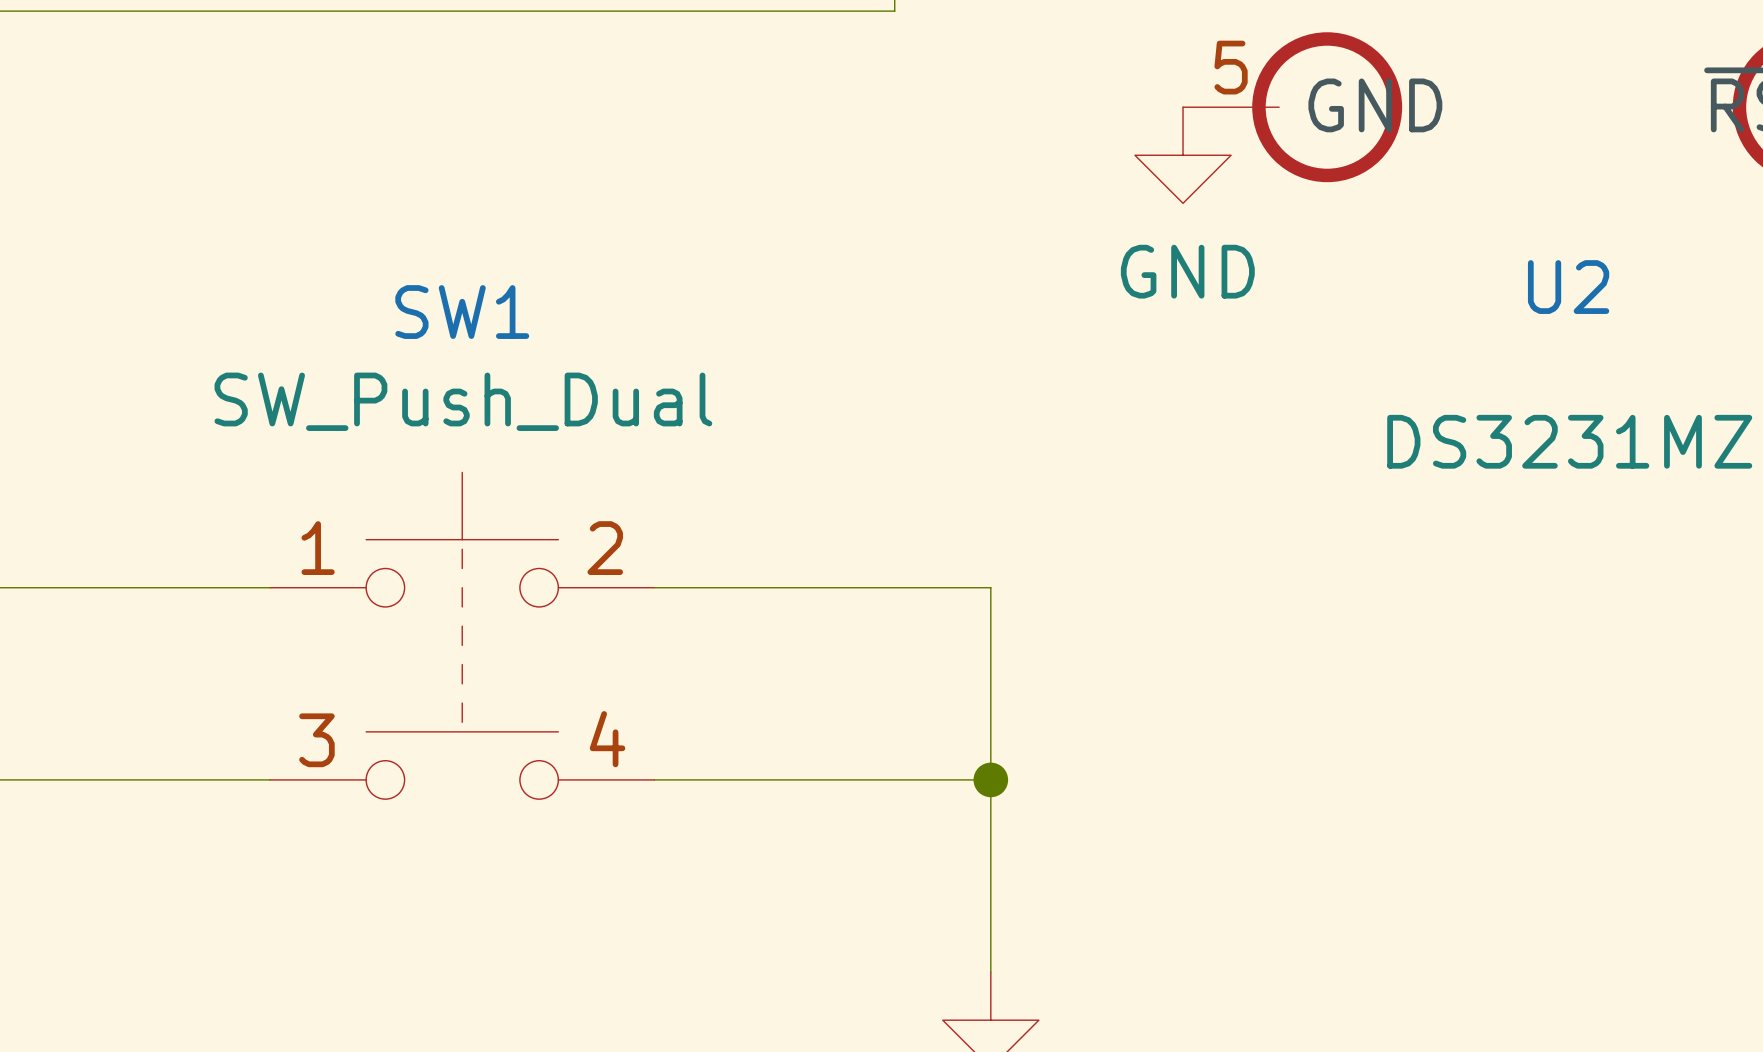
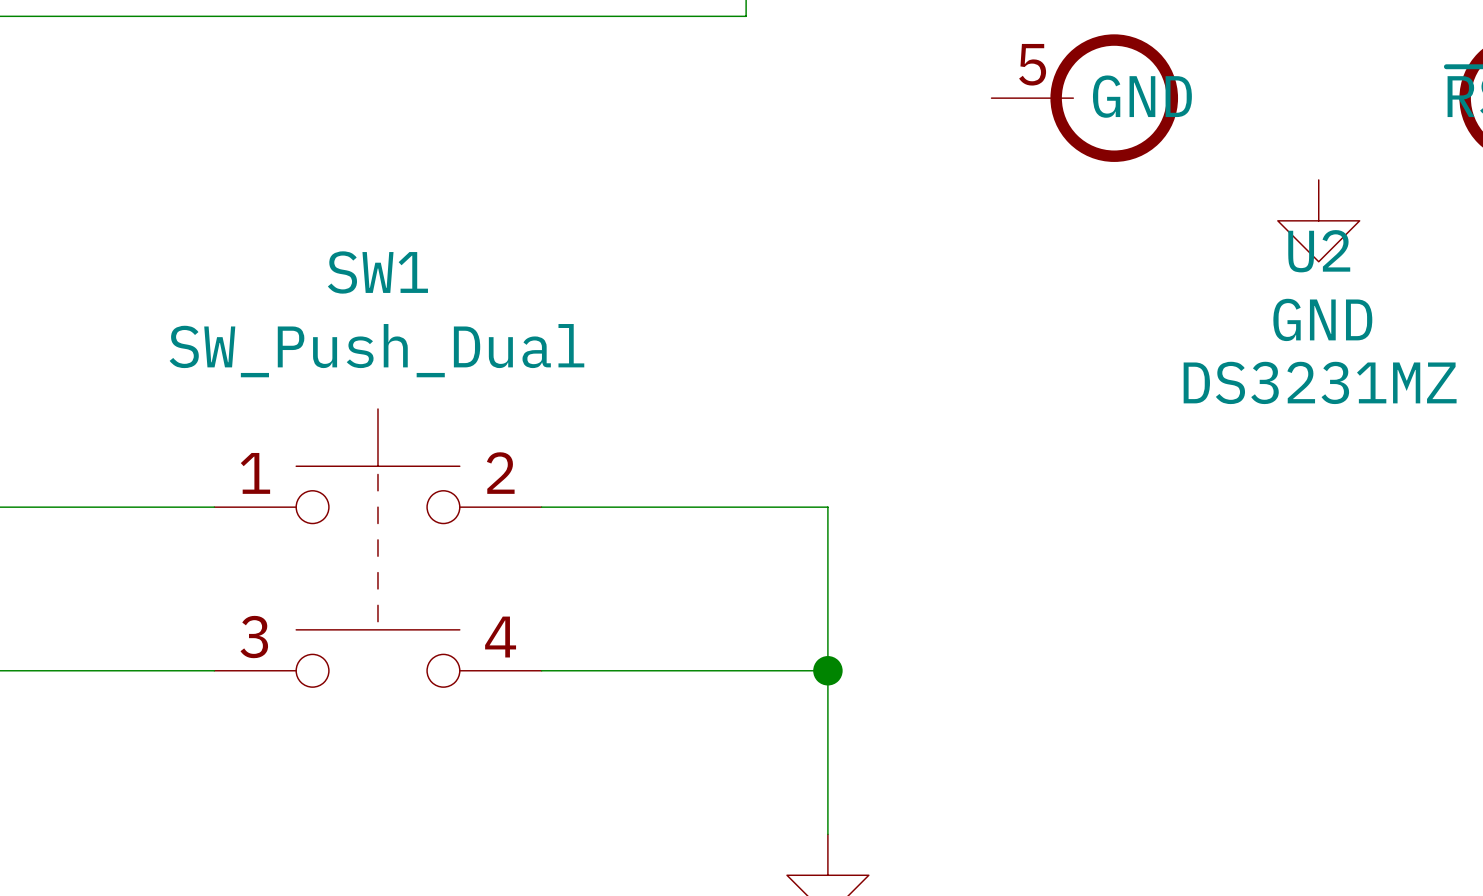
power symbol position: GND (1183, 155) -> GND (1318, 220)

